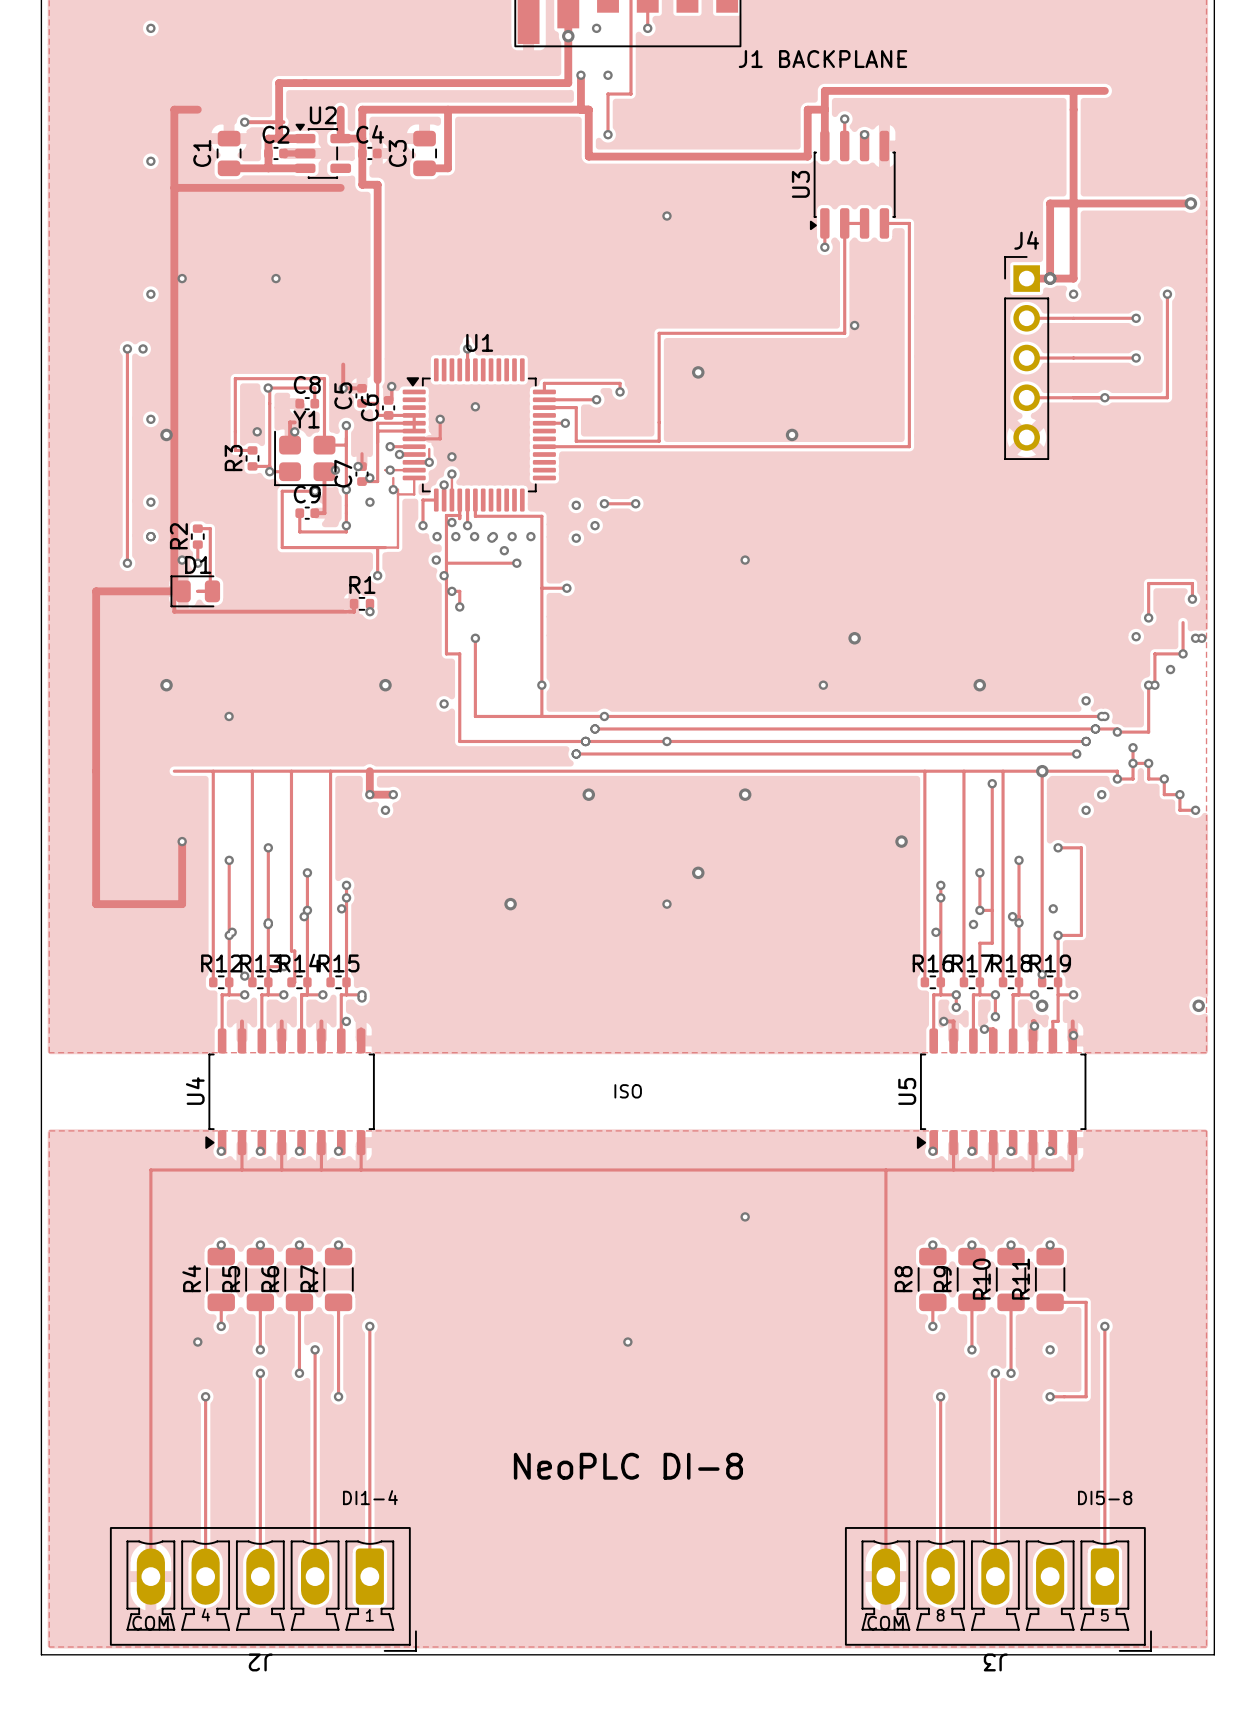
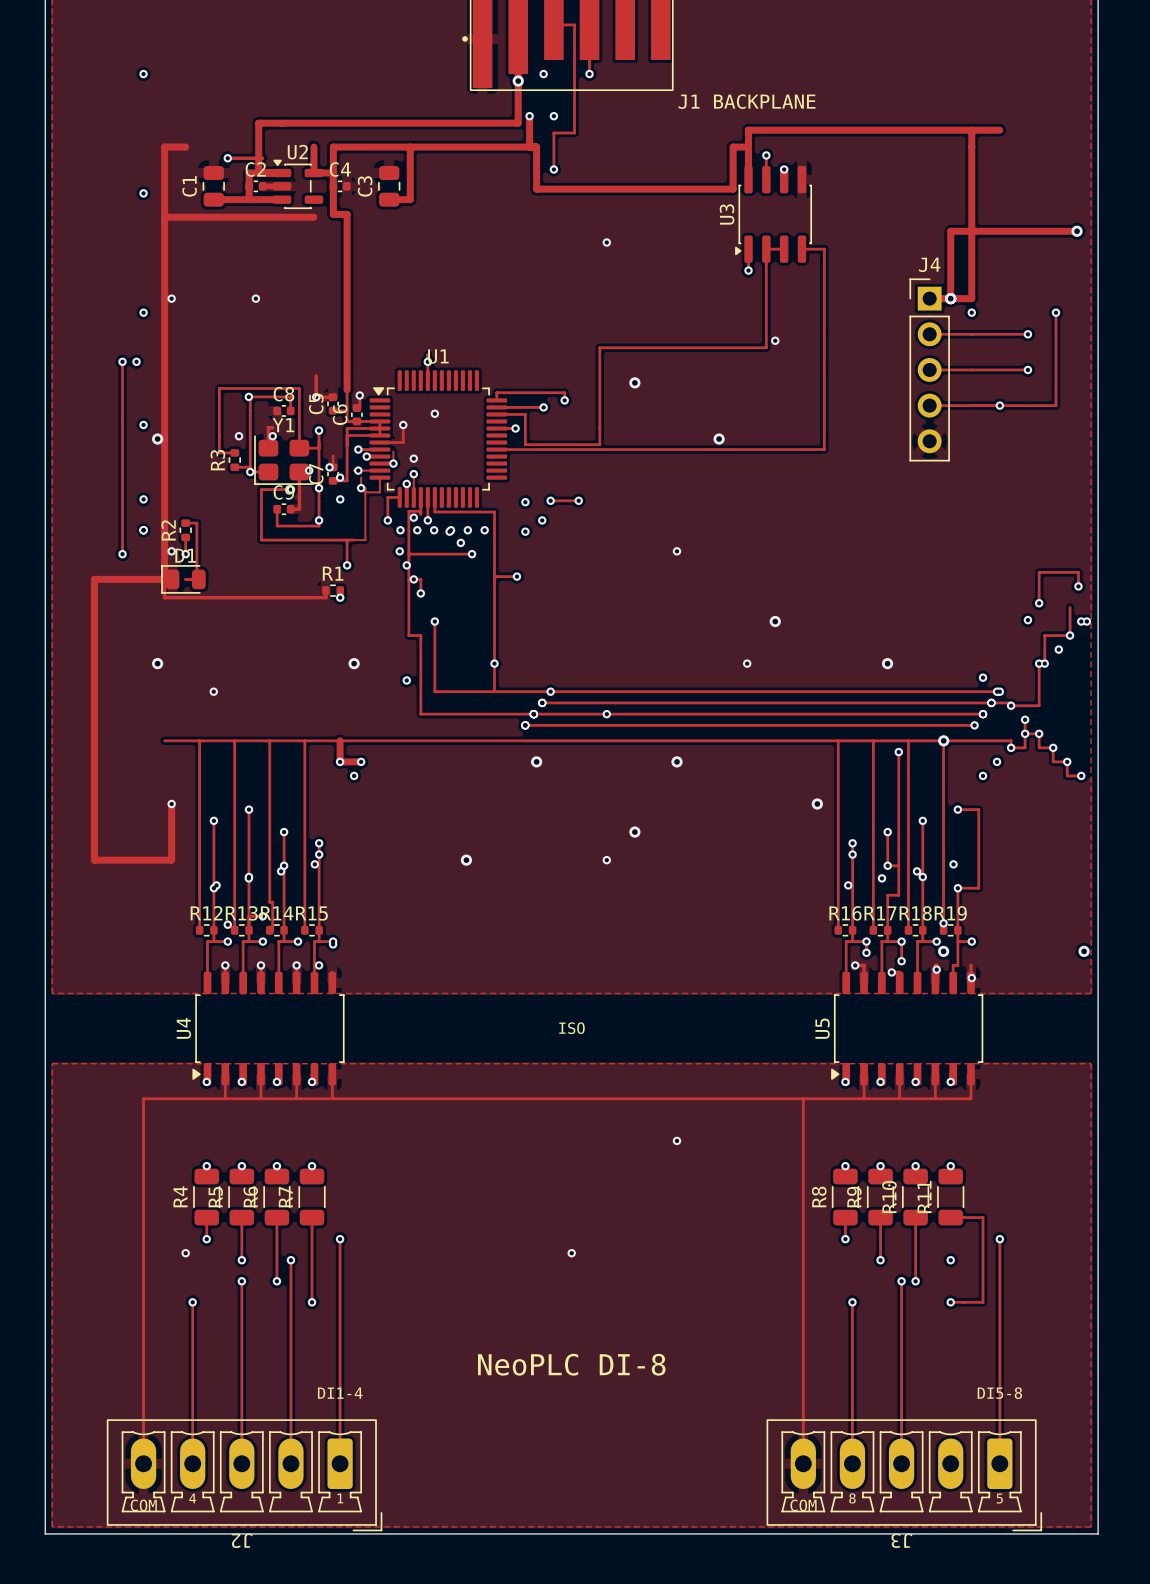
via: none -> (225, 965)
via: none -> (260, 965)
via: none -> (296, 965)

